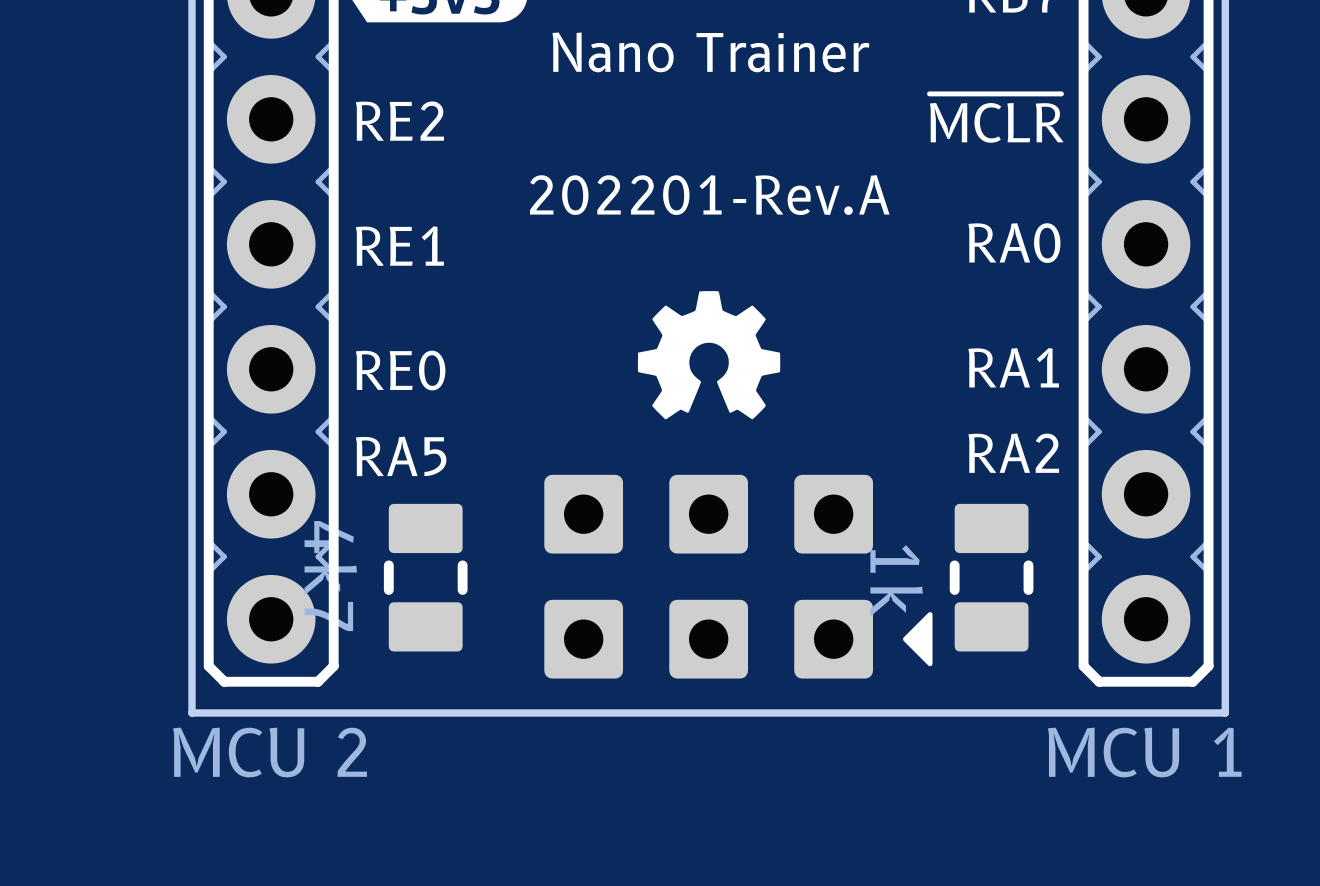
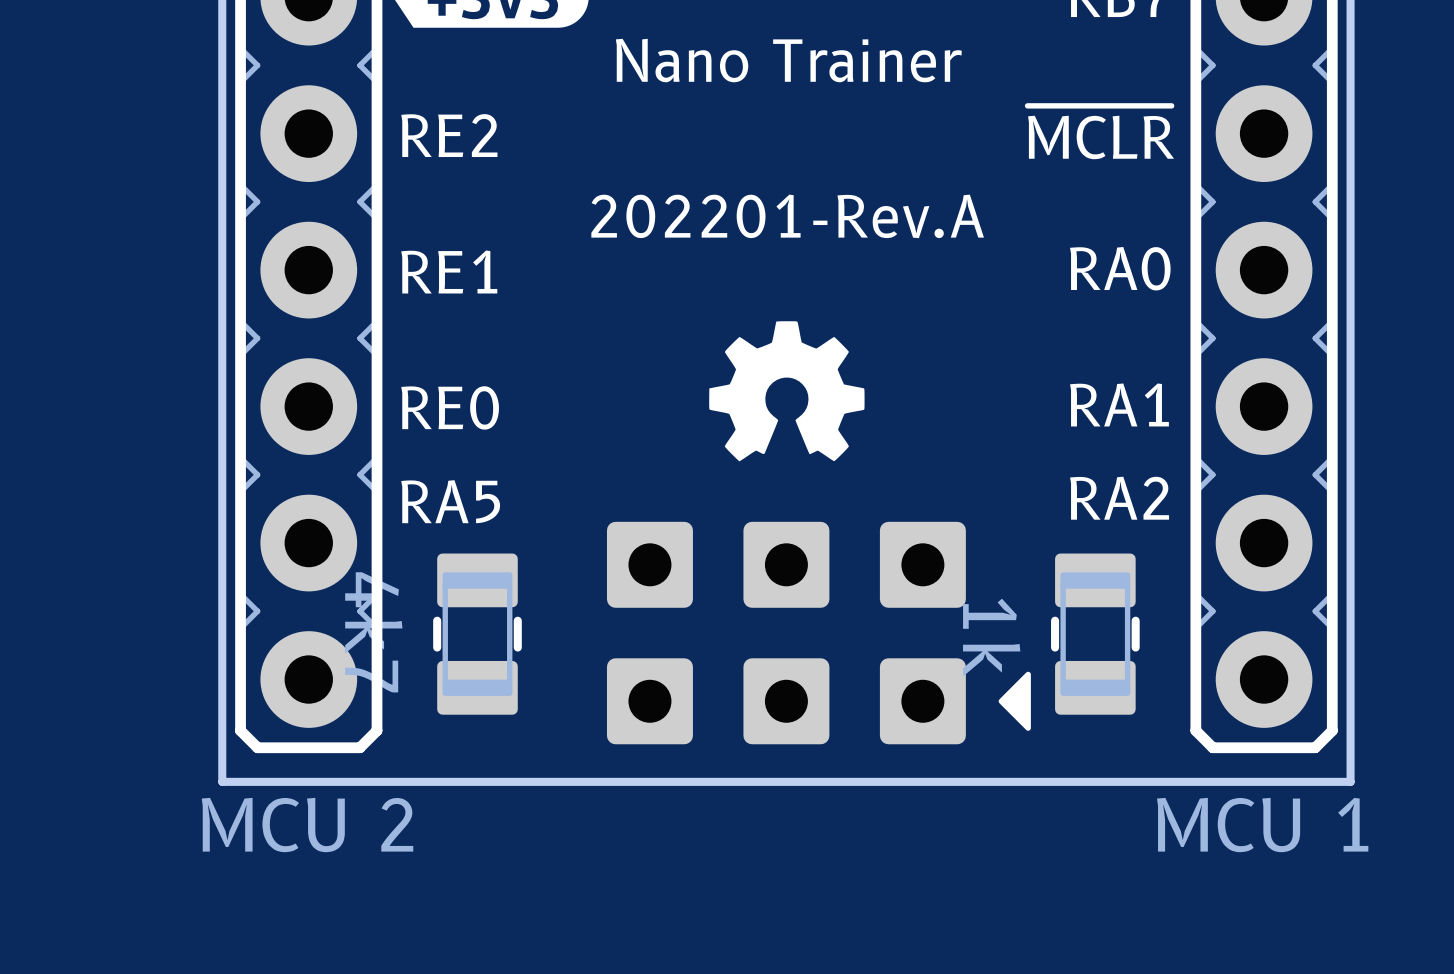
part footprint: [383, 503, 468, 652] -> [433, 553, 522, 715]
part footprint: [949, 503, 1034, 652] -> [1051, 553, 1140, 715]

